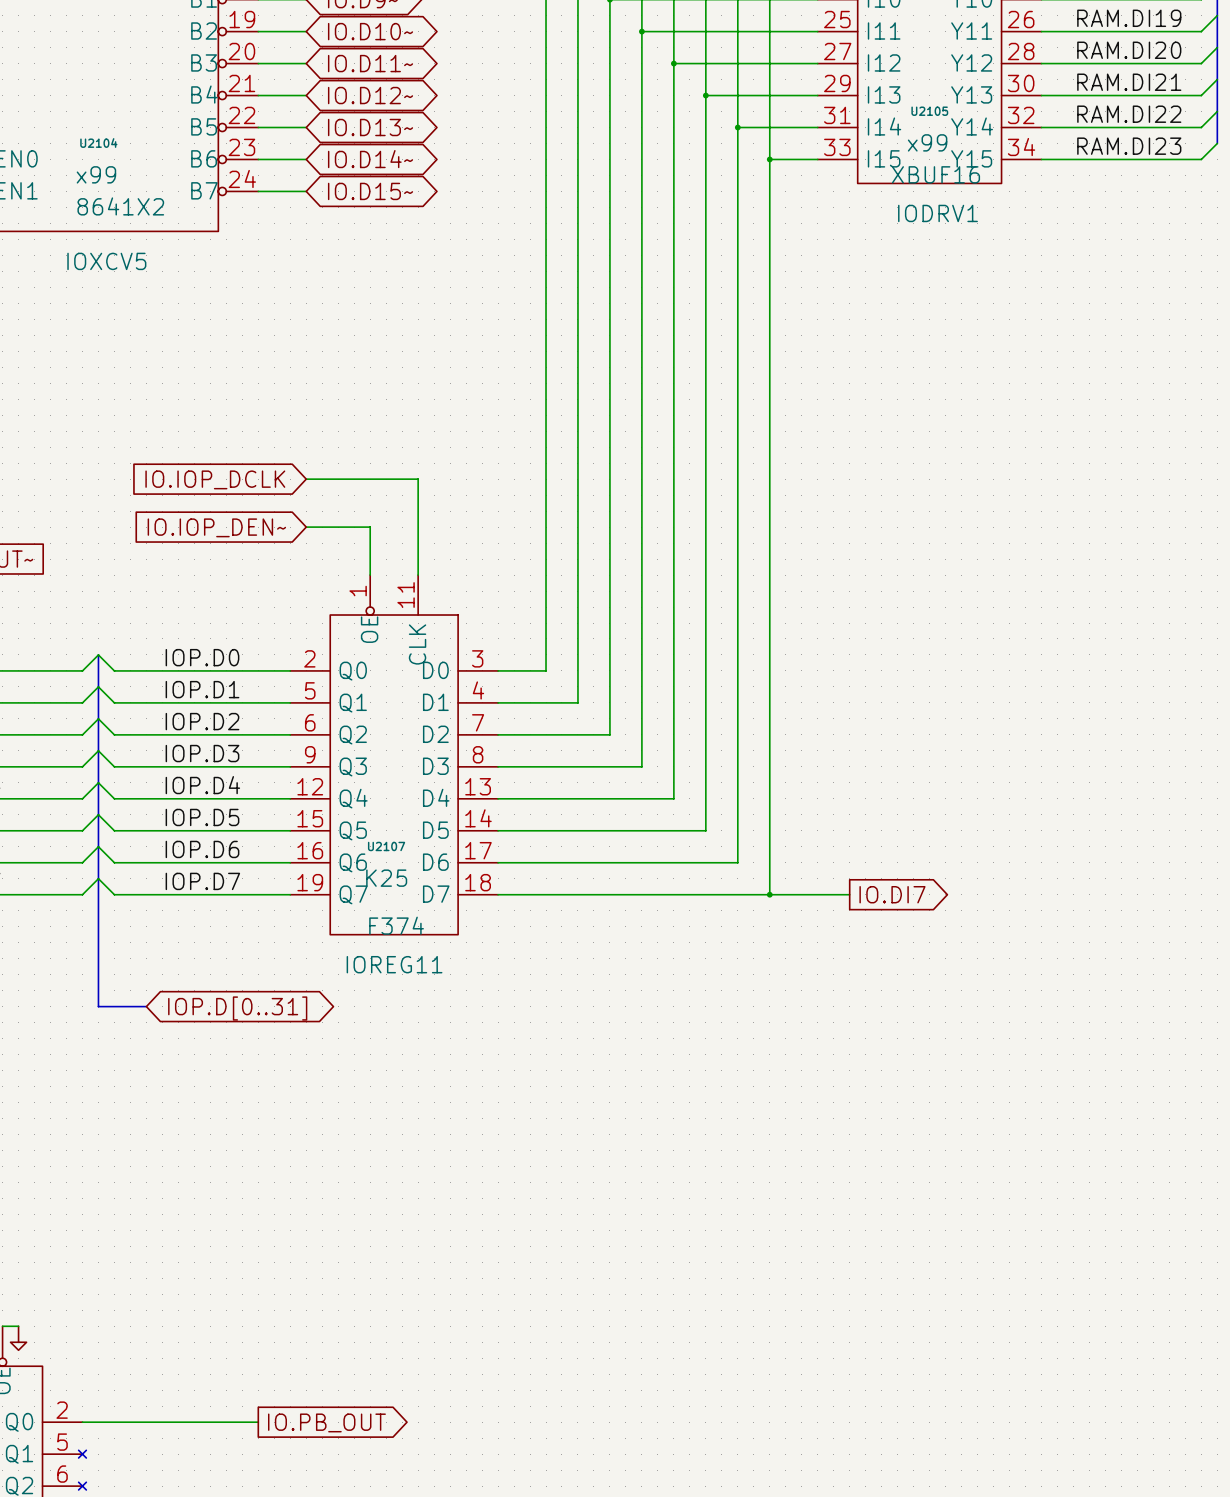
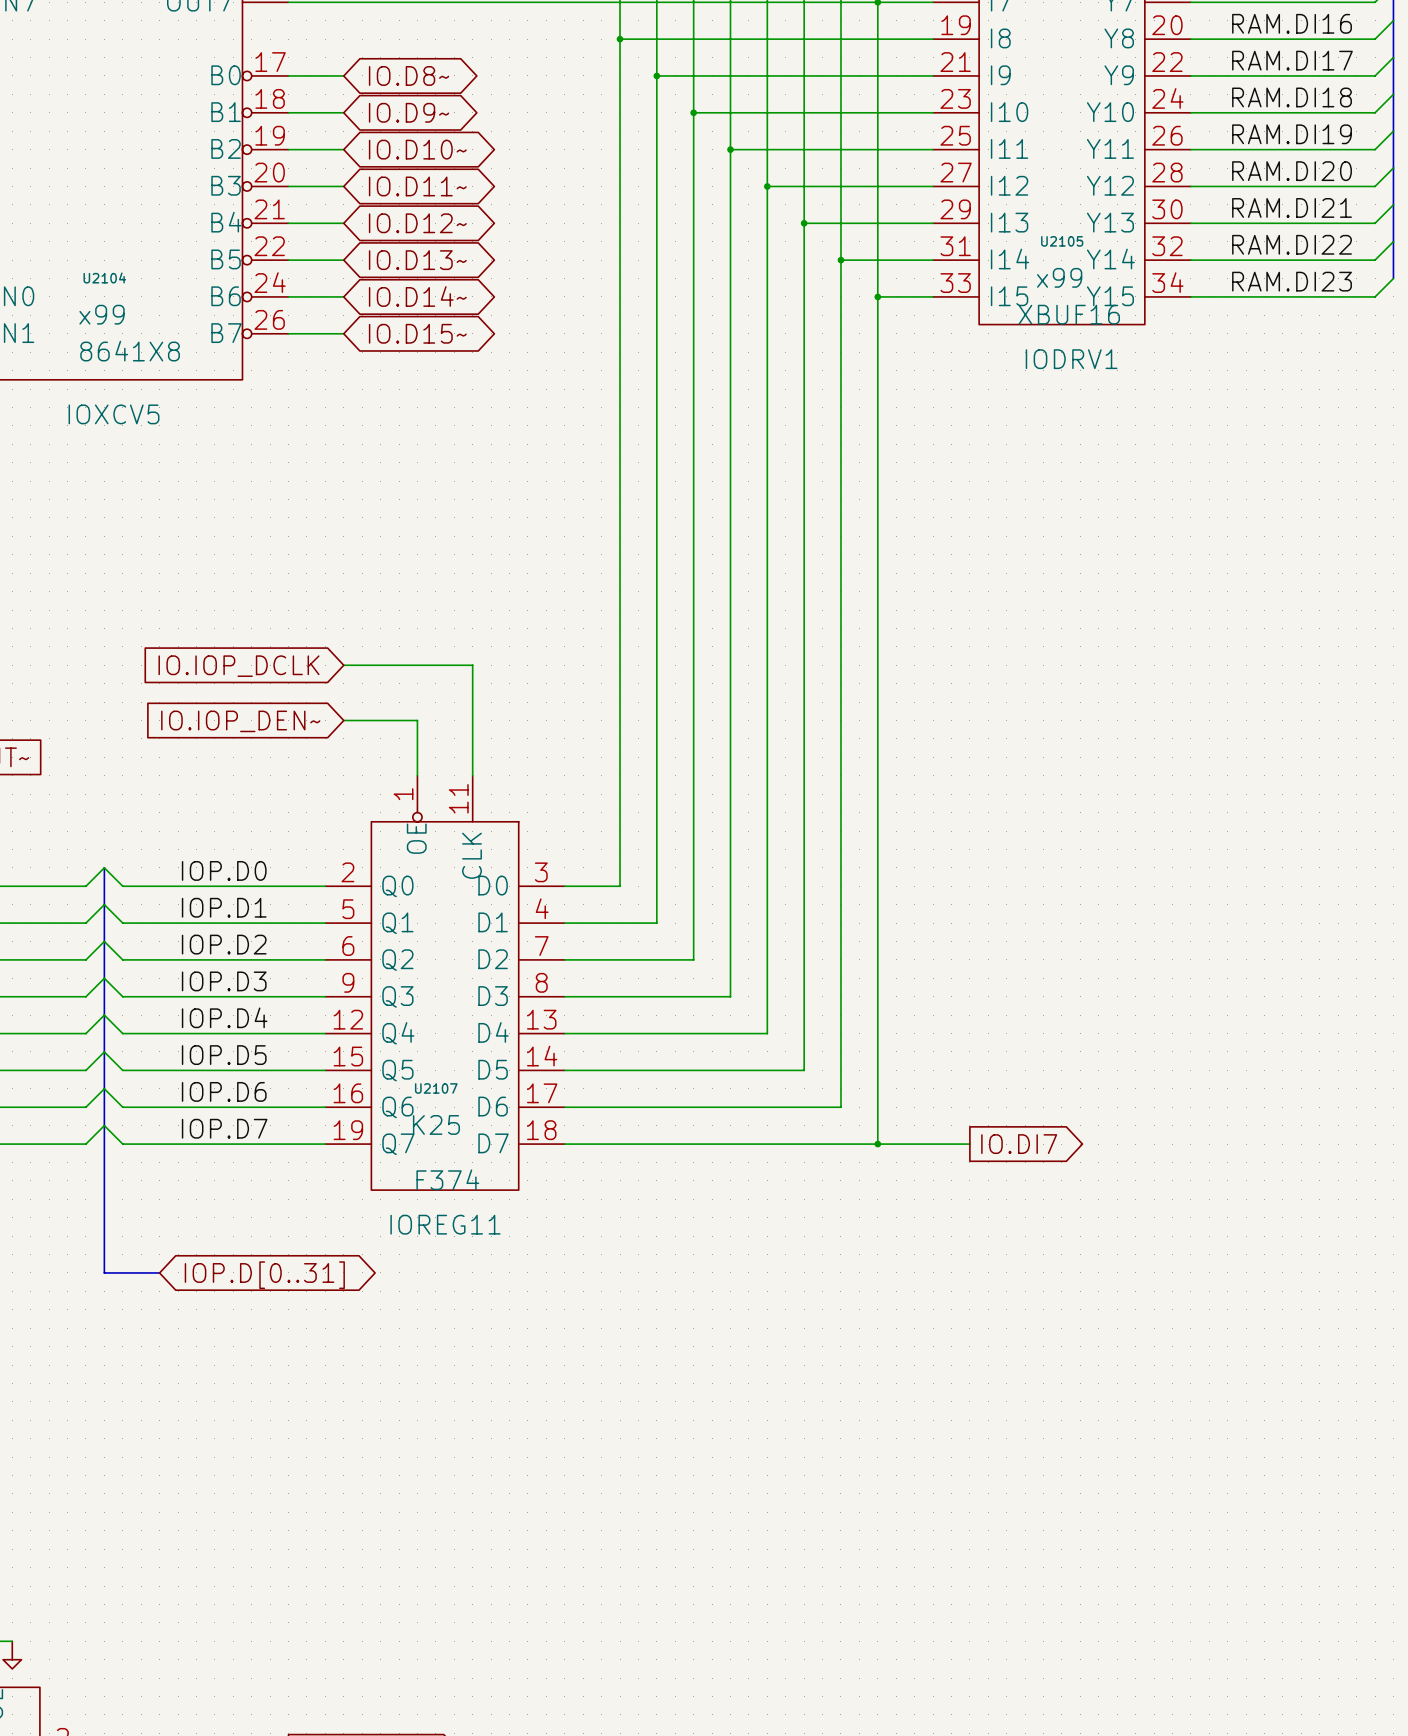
U2104 pin number: 23 (241, 147) -> 24 (270, 282)
U2104 pin number: 24 (242, 178) -> 26 (269, 319)
U2104 value: 8641X2 (120, 206) -> 8641X8 (130, 351)

